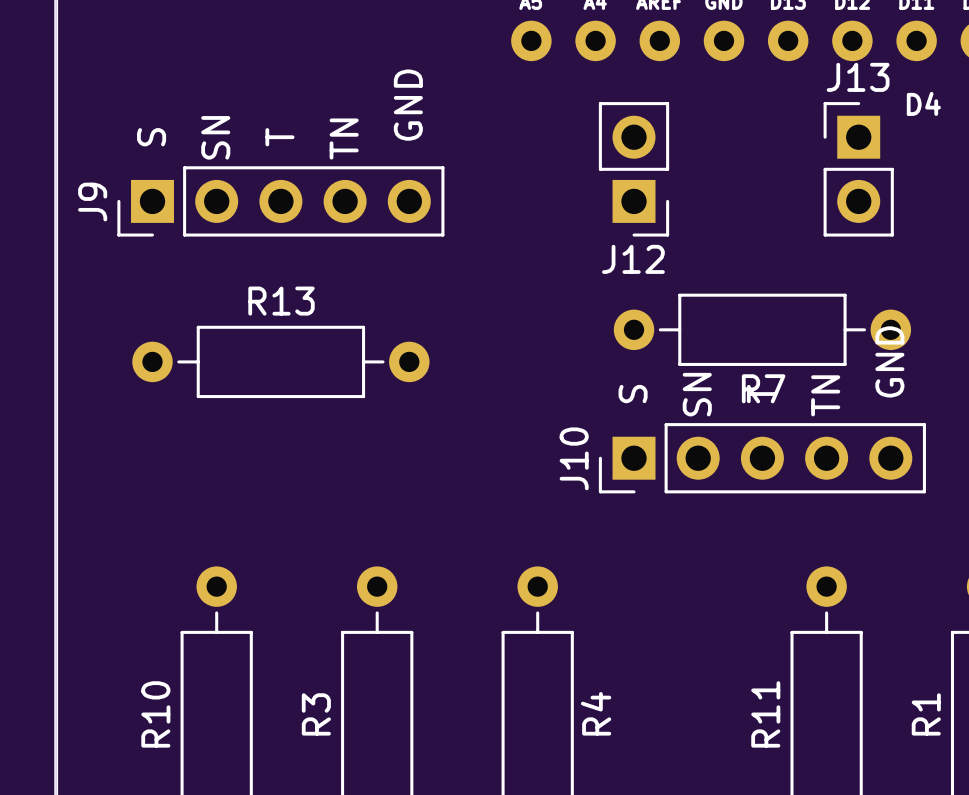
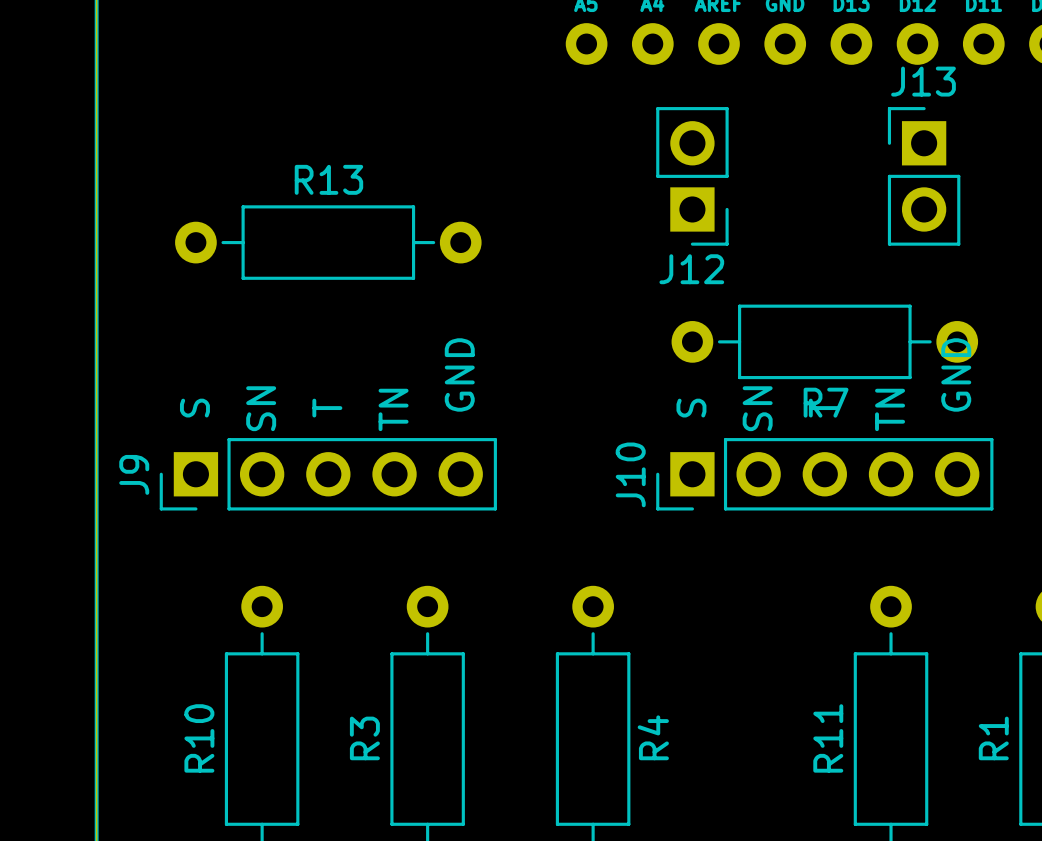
text: D4 (923, 103) -> none
J9 position: (280, 201) -> (328, 474)
R13 position: (280, 361) -> (328, 242)

